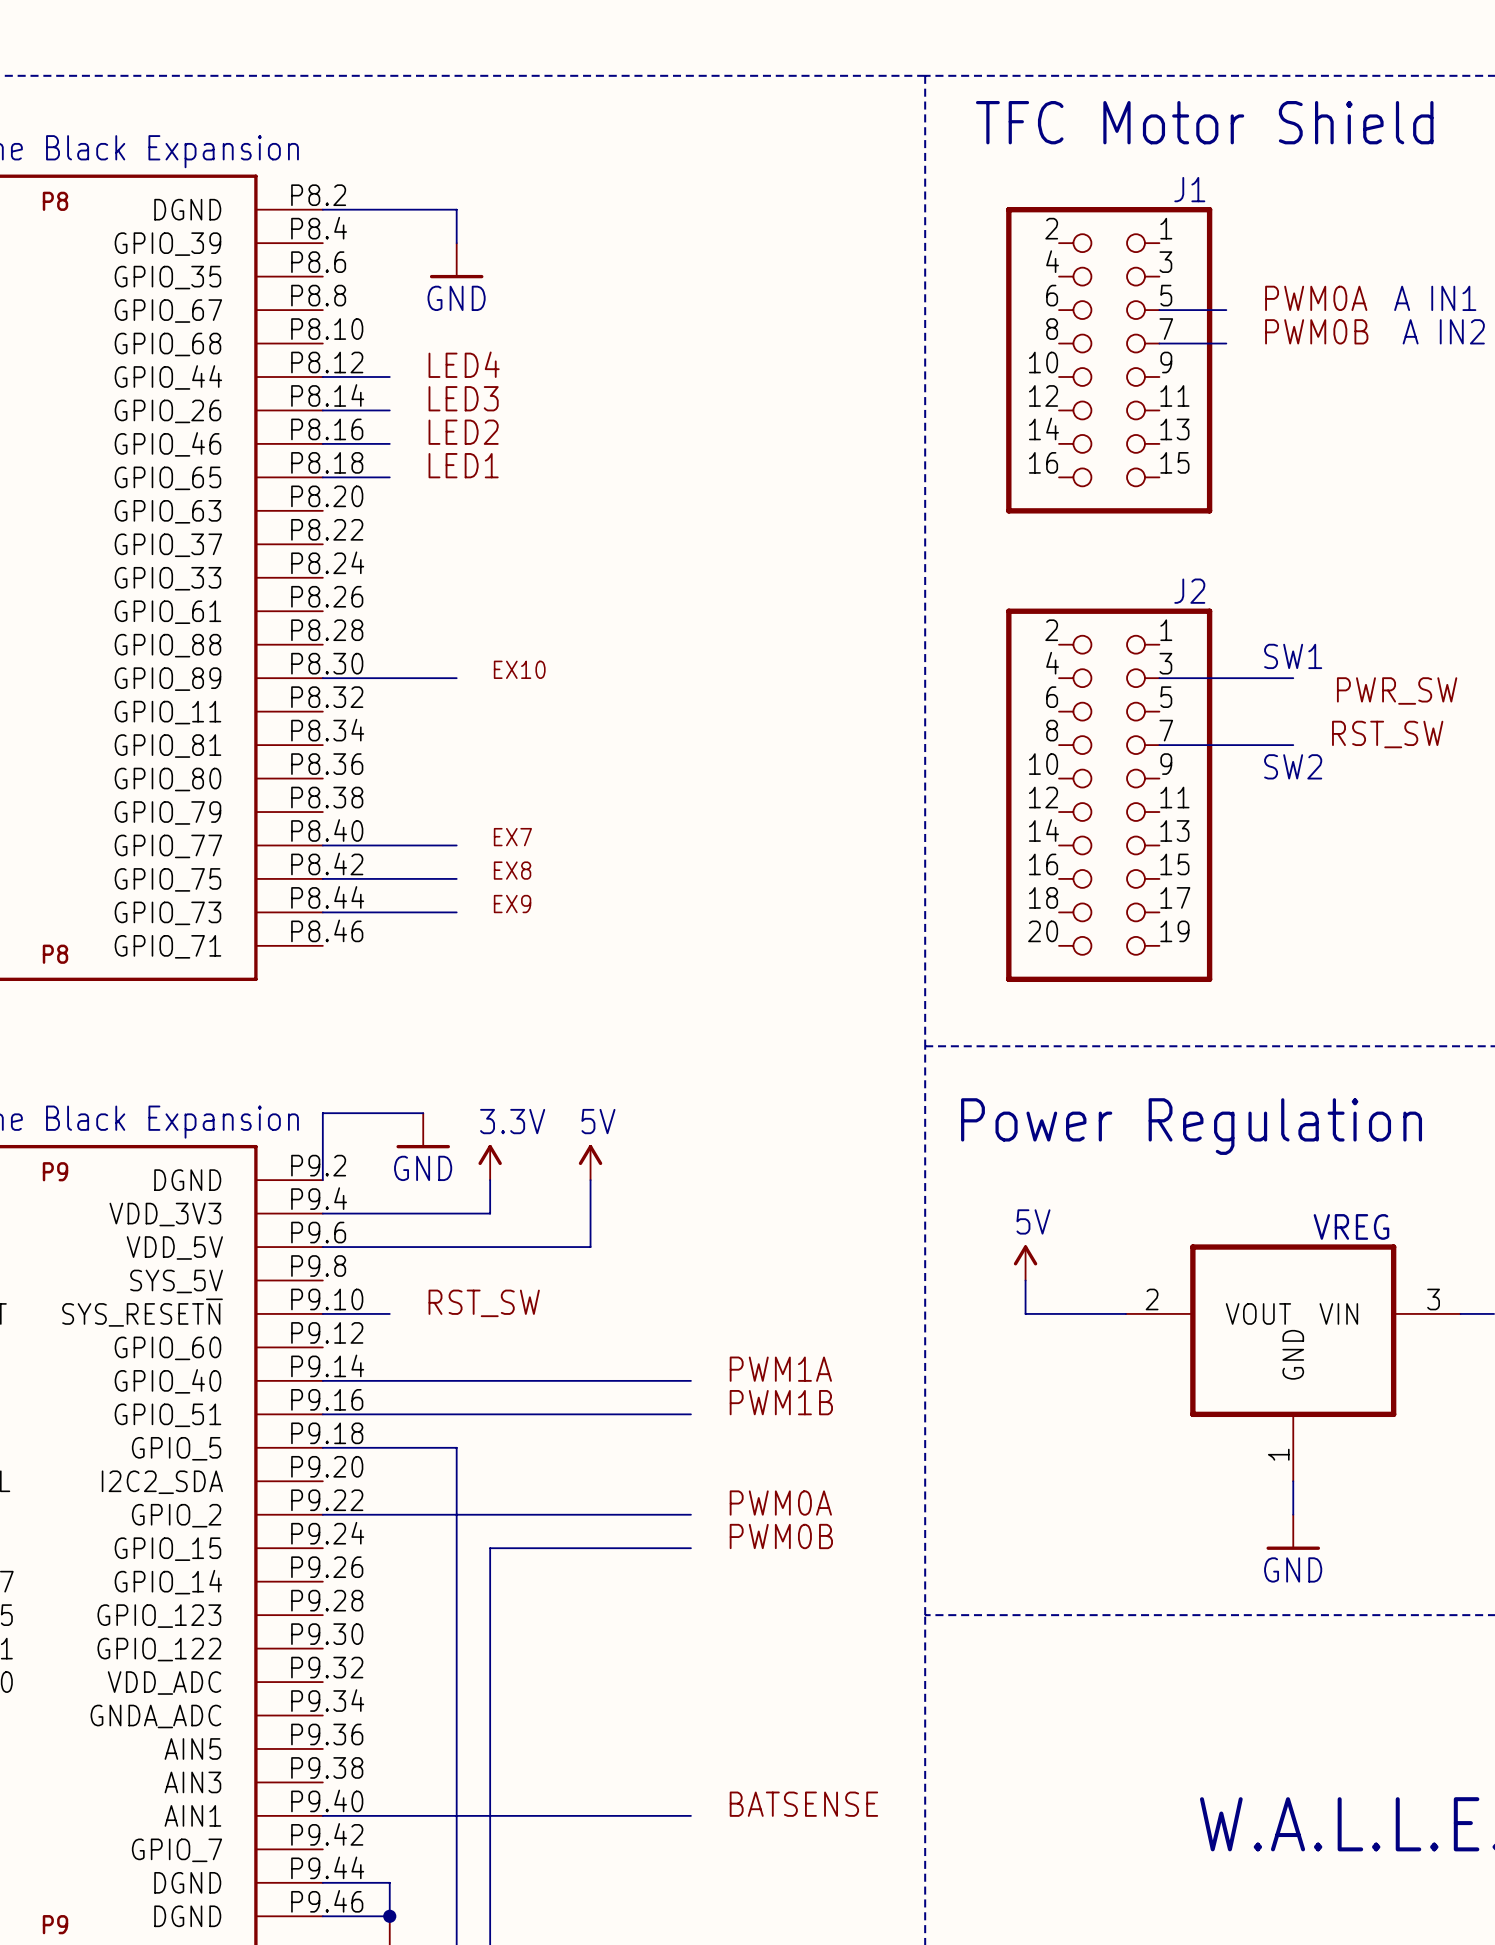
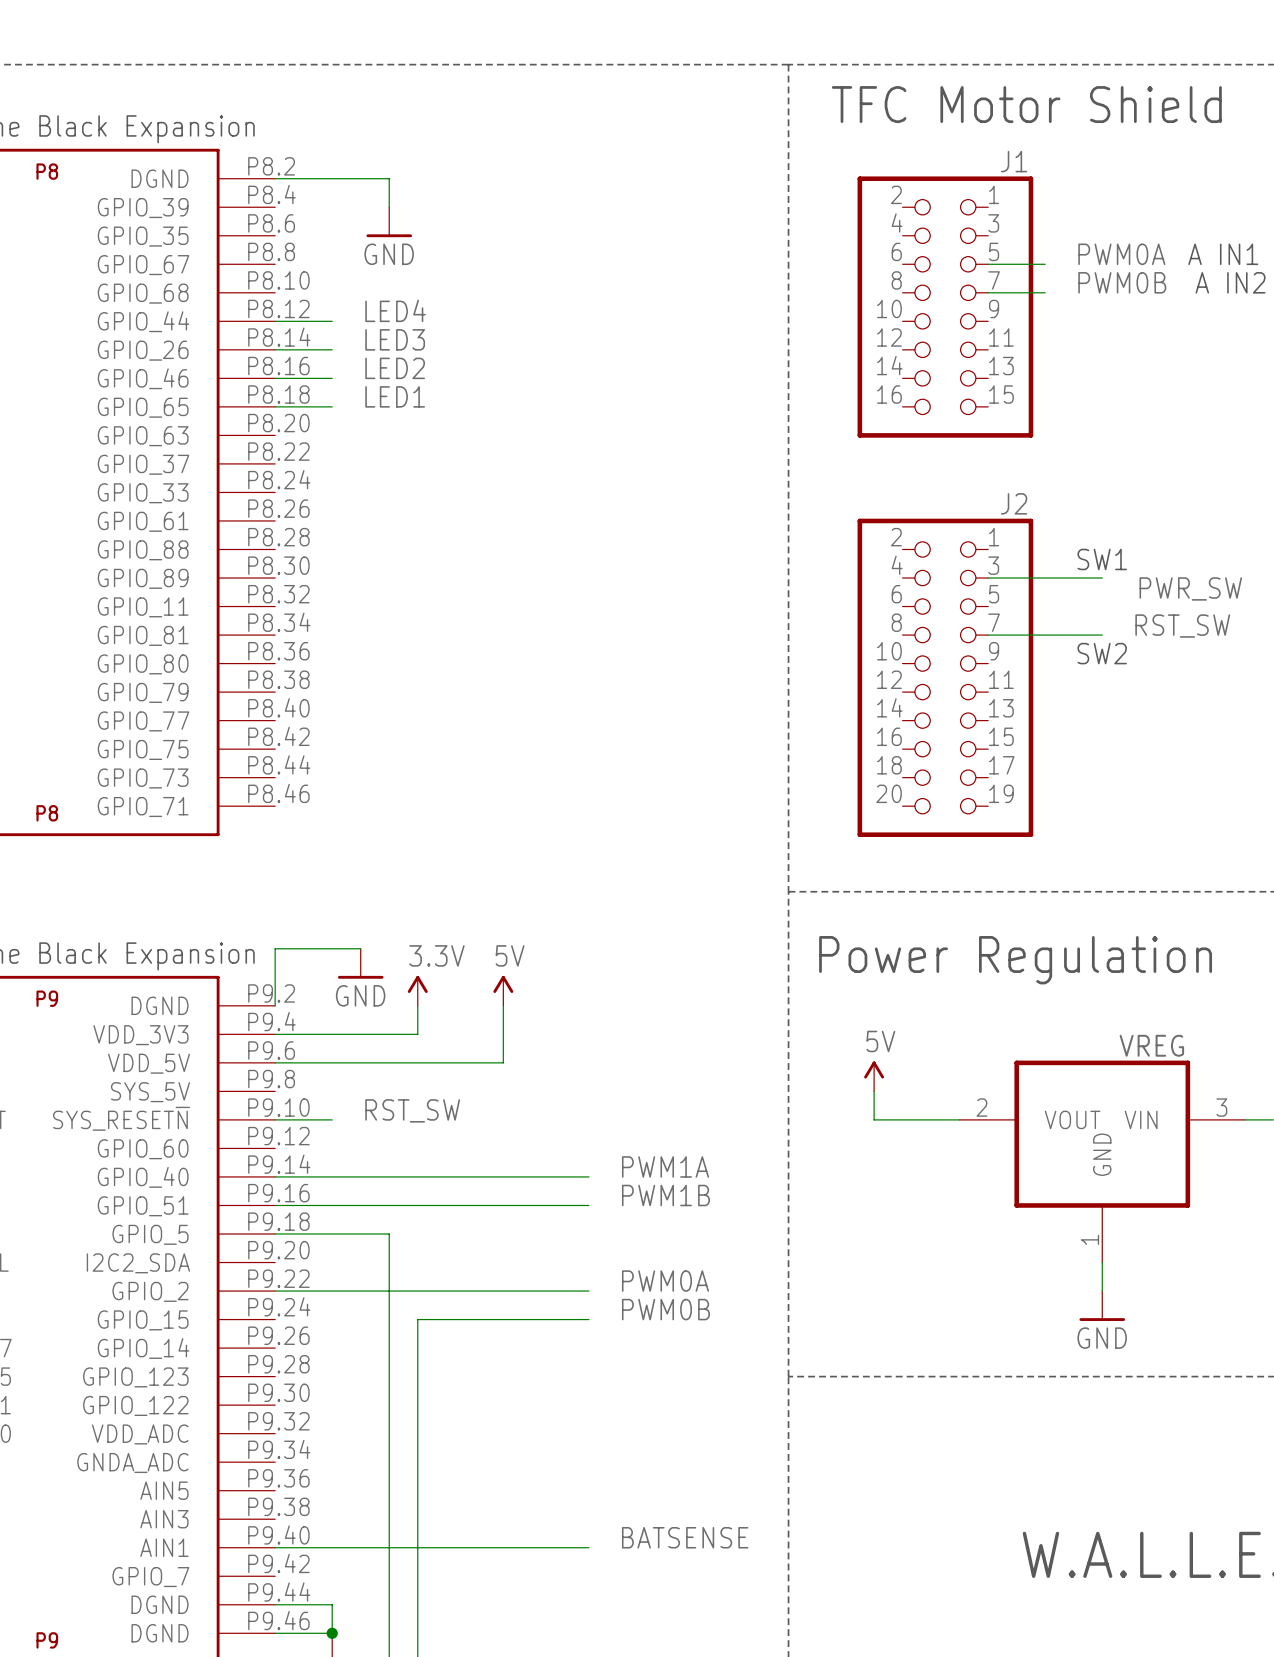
label: EX10 (519, 669) -> none
wire: (322, 678) (456, 678) -> none
label: EX7 (512, 837) -> none
wire: (322, 845) (456, 845) -> none
label: EX8 (512, 870) -> none
wire: (322, 878) (456, 878) -> none
label: EX9 (512, 904) -> none
wire: (322, 912) (456, 912) -> none

